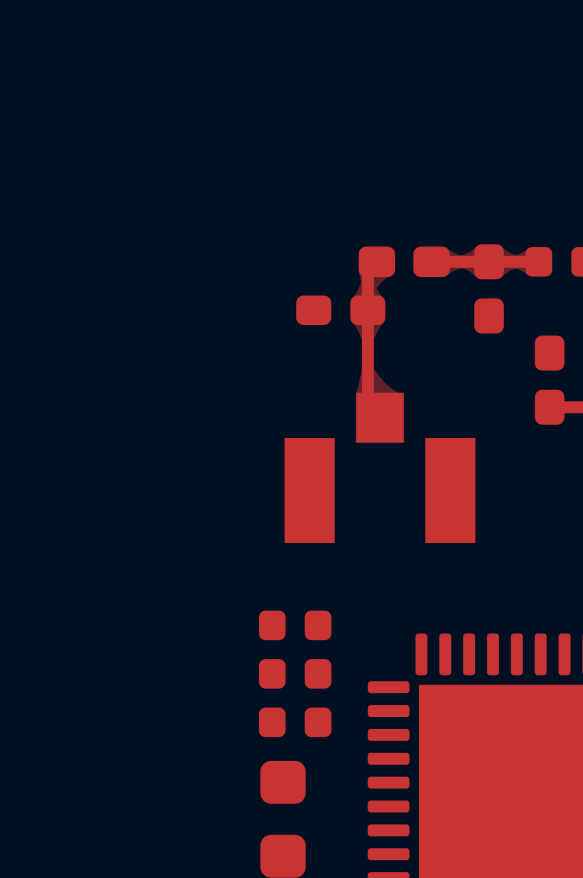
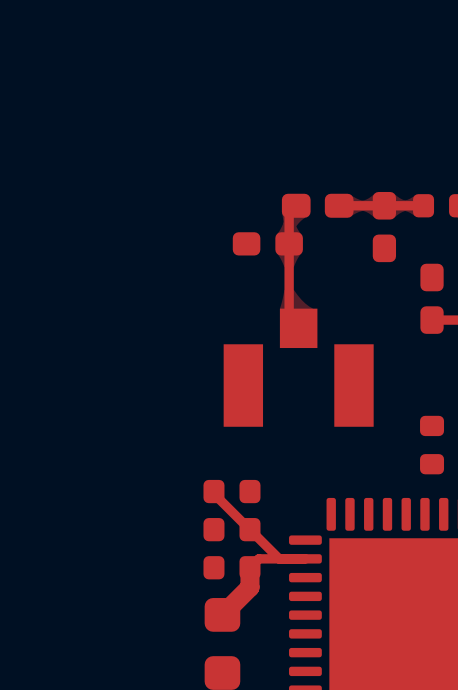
part: none -> (432, 445)
top track: none -> (212, 492) (279, 558)
top track: none -> (305, 558) (258, 558) (249, 567) (249, 587) (222, 614)

